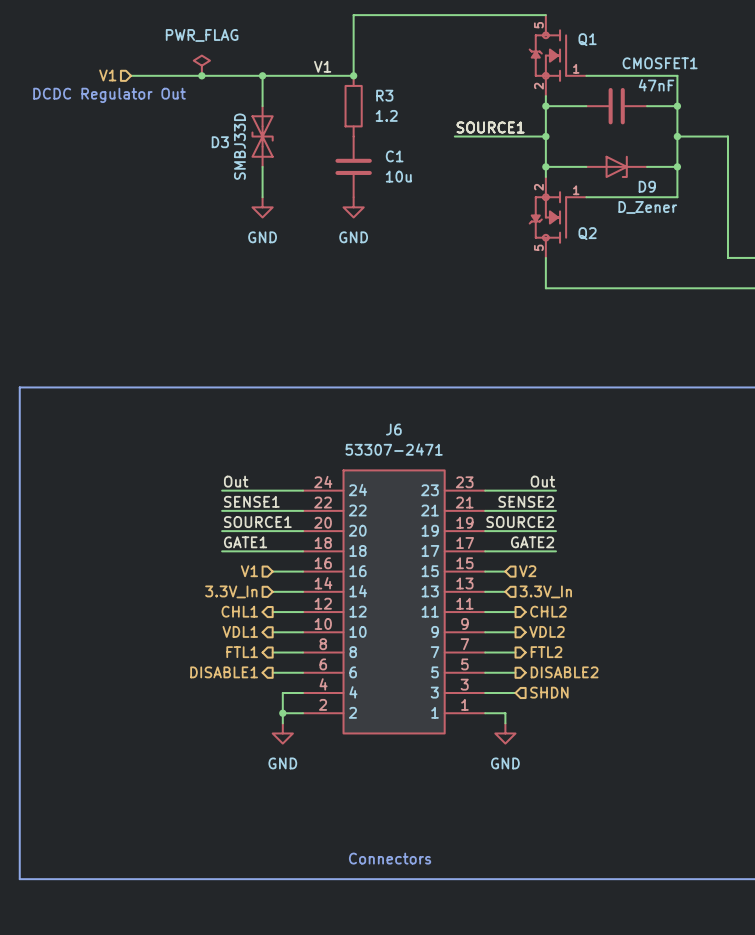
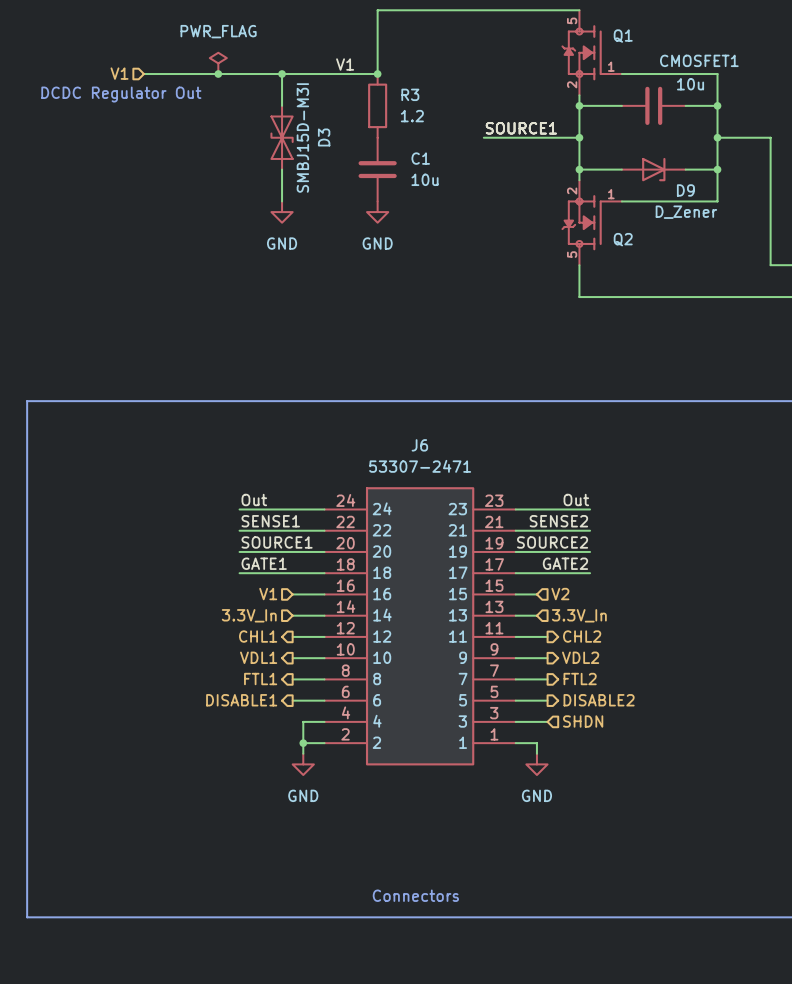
CMOSFET1 value: 47nF (656, 85) -> 10u (690, 84)
D3 name rotation: 0° (220, 142) -> 90° counterclockwise (324, 137)
D3 name position: D3 (220, 142) -> D3 (324, 137)
D3 value: SMBJ33D (239, 146) -> SMBJ15D-M3I (302, 137)

